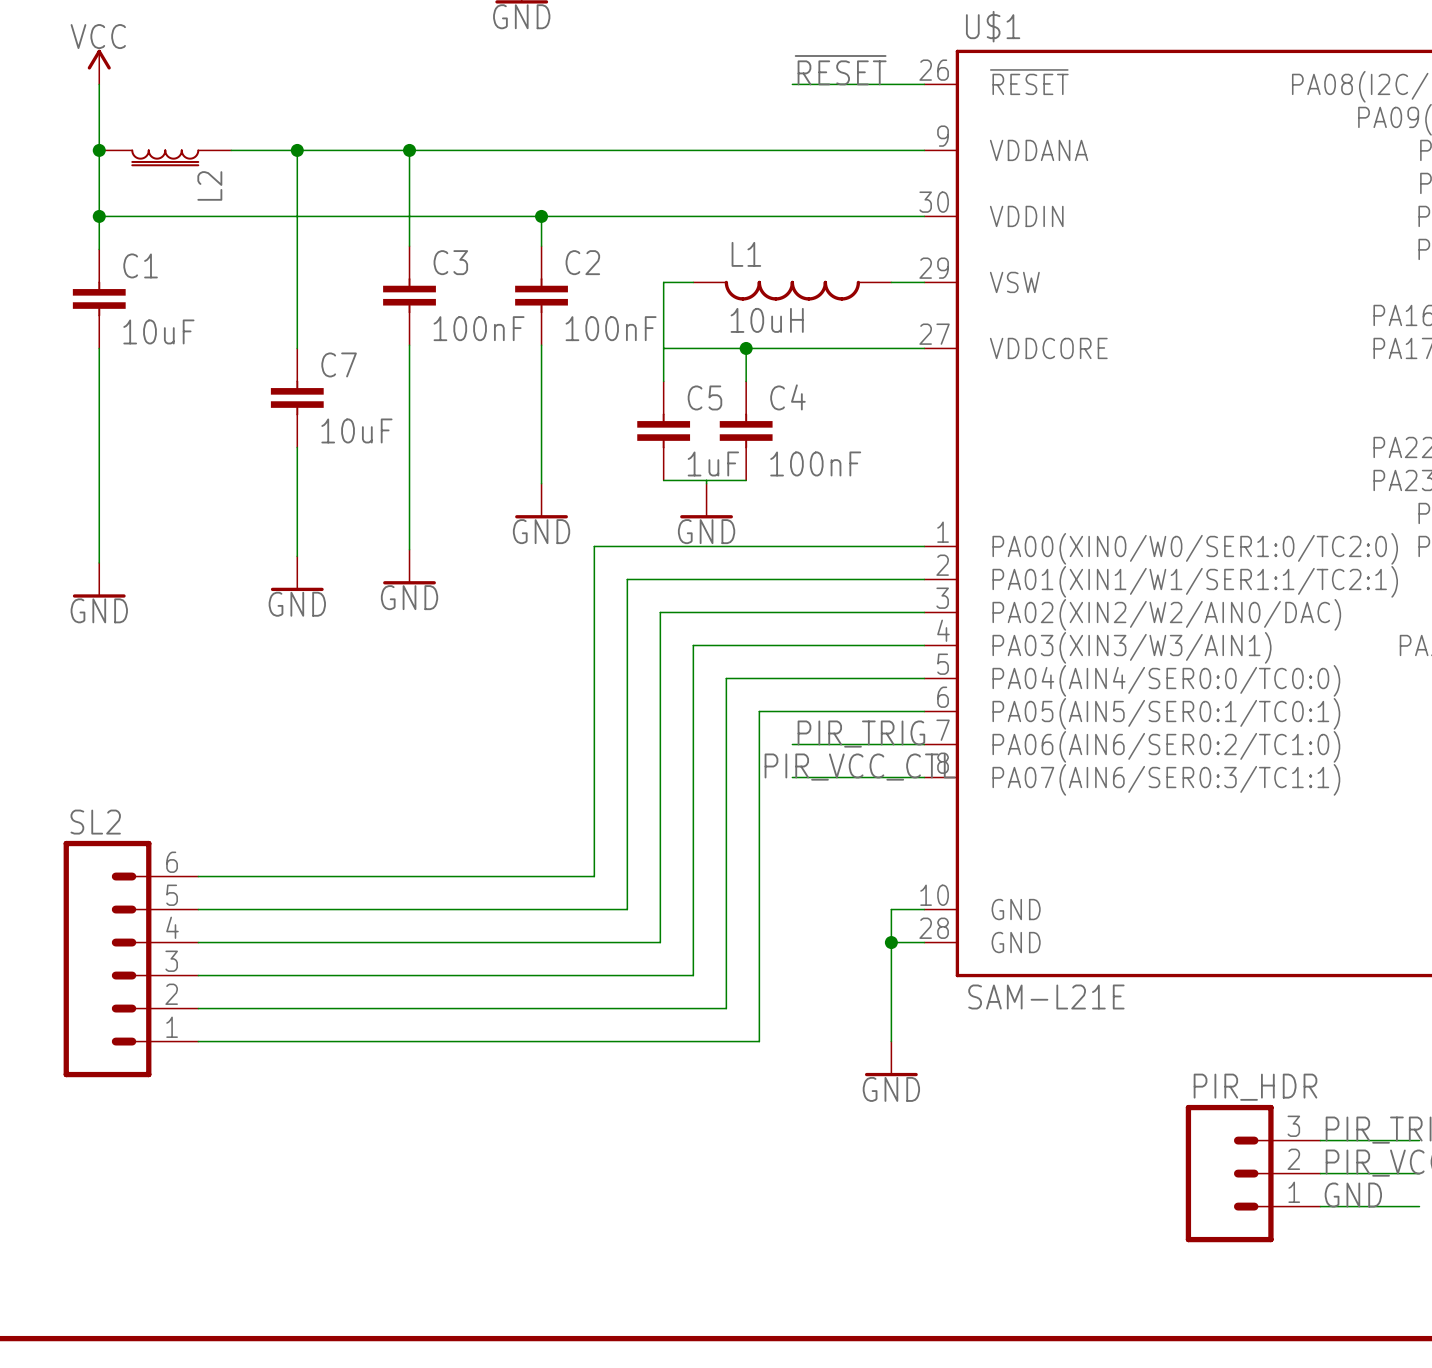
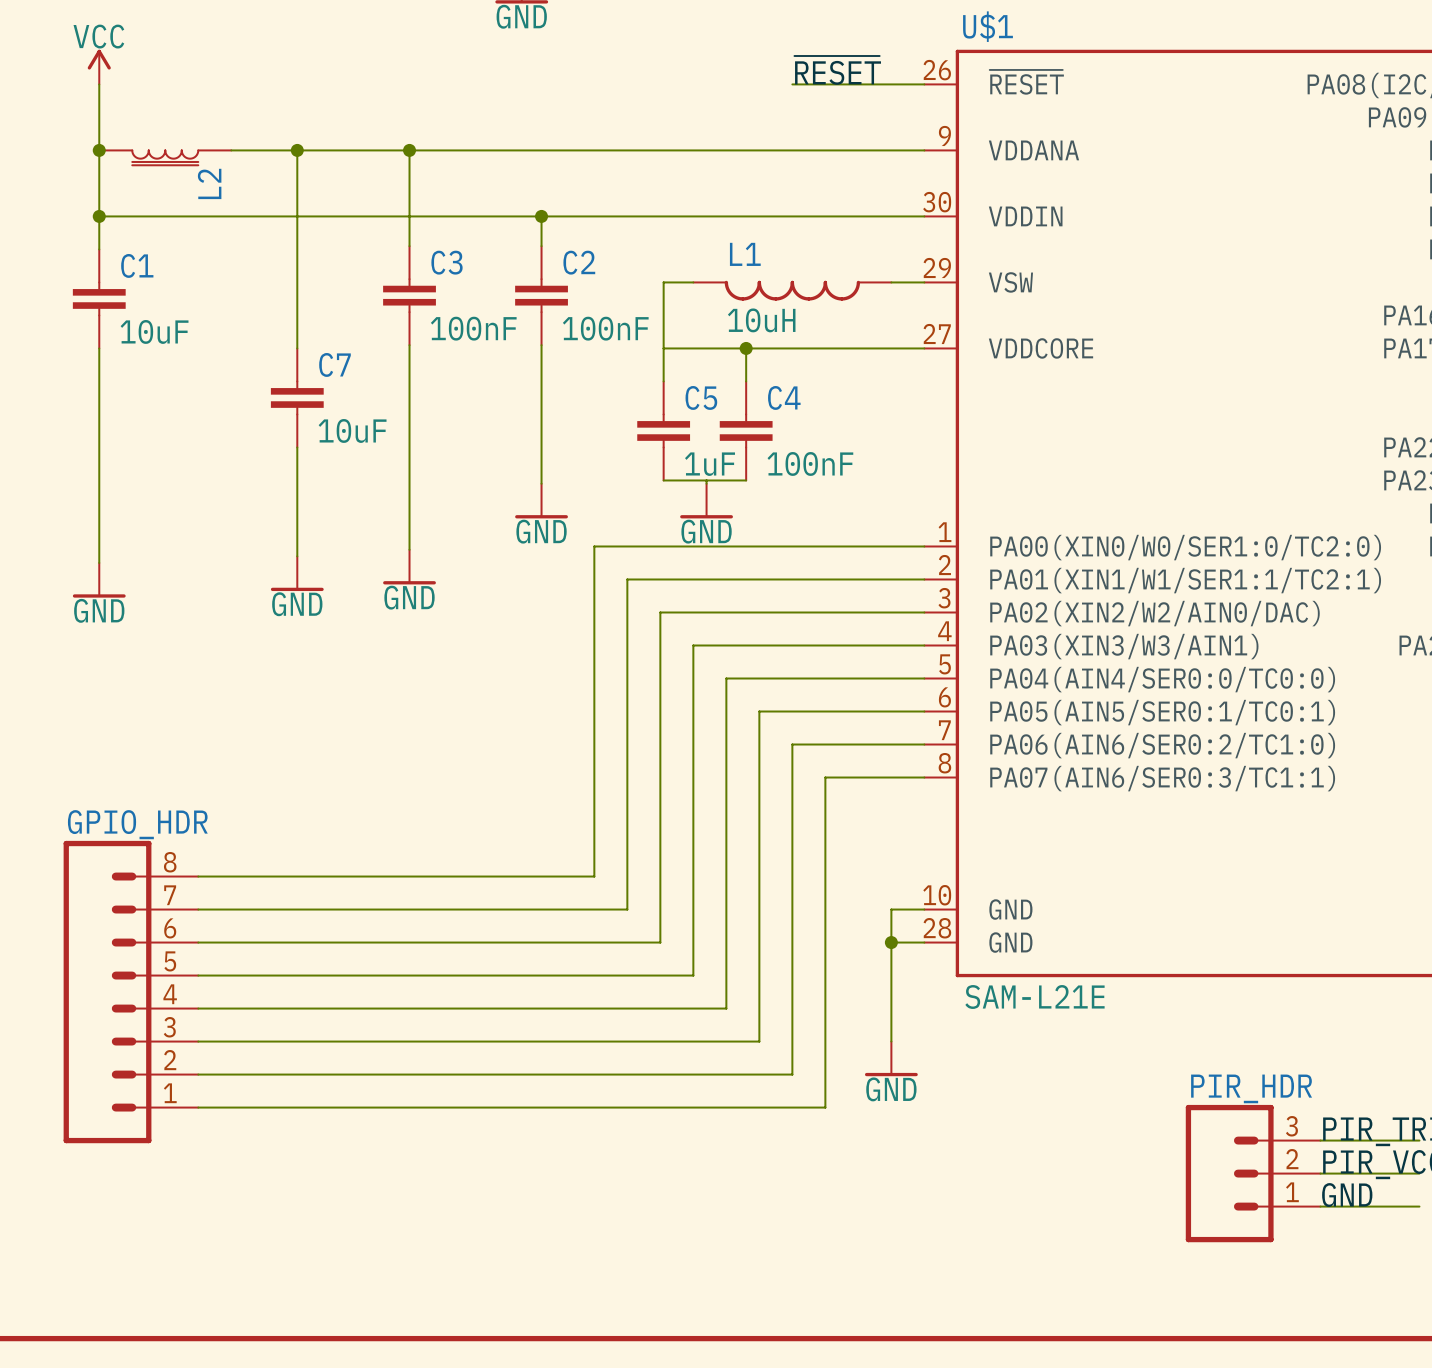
label: PIR_TRIG (861, 734) -> none
wire: none -> (792, 744) (792, 1074) (198, 1074)
label: PIR_VCC_CTL (860, 767) -> none
wire: (792, 777) (825, 777) -> (198, 1107) (825, 1107) (825, 777)
SL2: (130, 959) -> none
GPIO_HDR: none -> (130, 992)

